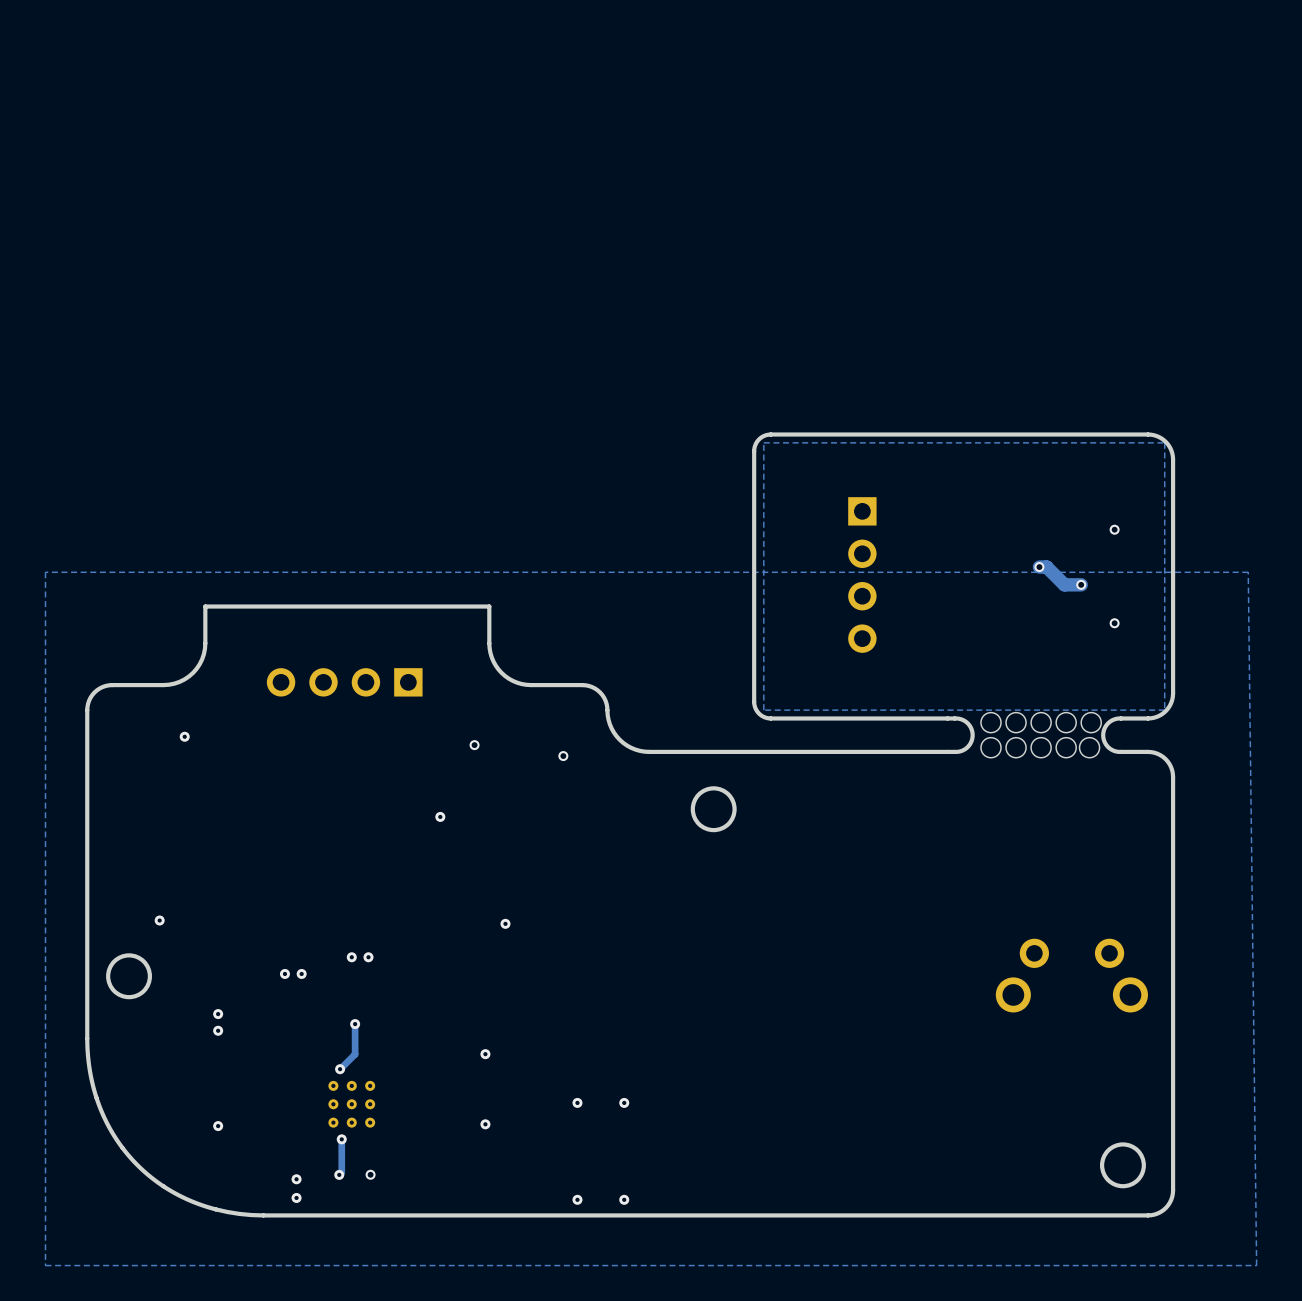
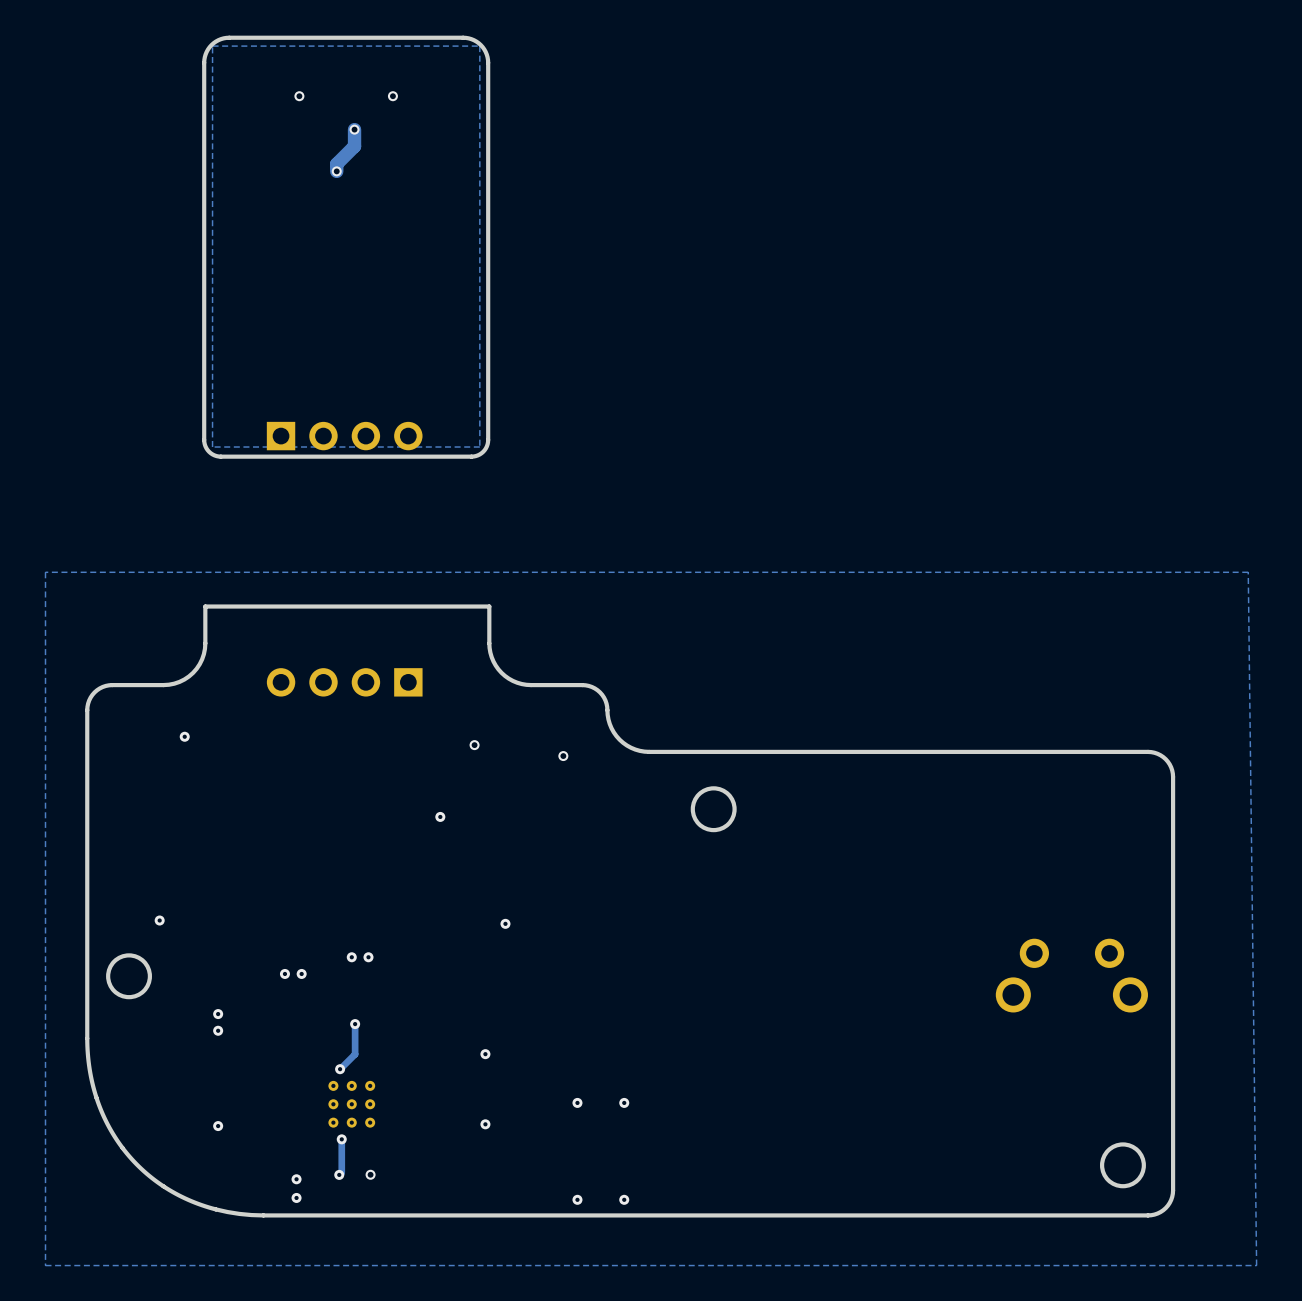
board edge: none -> (463, 37) (229, 37) (218, 40) (208, 49) (204, 62) (204, 439) (206, 448) (212, 454) (220, 456) (471, 456) (479, 454) (485, 448) (488, 439) (488, 62) (485, 51) (480, 45) (473, 40) (463, 37)
zone outline: none -> (479, 46) (212, 46) (212, 447) (479, 447) (479, 46)
via: none -> (299, 96)
via: none -> (392, 96)
track: none -> (354, 129) (354, 146) (336, 164) (336, 171)
via: none -> (354, 129)
via: none -> (336, 171)
part: none -> (344, 436)
zone outline: (1164, 442) (1164, 710) (763, 710) (763, 442) (1164, 442) -> none
via: (1114, 529) -> none
track: (1039, 567) (1046, 567) (1064, 584) (1081, 584) -> none
via: (1039, 567) -> none
part: (862, 574) -> none
via: (1081, 584) -> none
via: (1114, 623) -> none
round board edge: [980, 712, 1002, 734] -> none
round board edge: [1005, 712, 1027, 734] -> none
round board edge: [1030, 712, 1052, 734] -> none
round board edge: [1055, 712, 1077, 734] -> none
round board edge: [1080, 712, 1102, 734] -> none
round board edge: [980, 737, 1002, 759] -> none
round board edge: [1005, 737, 1027, 759] -> none
round board edge: [1030, 737, 1052, 759] -> none
round board edge: [1055, 737, 1077, 759] -> none
round board edge: [1079, 737, 1101, 759] -> none
board edge: (1121, 751) (1112, 750) (1105, 743) (1103, 733) (1107, 723) (1116, 718) (1157, 716) (1167, 708) (1172, 696) (1173, 459) (1170, 448) (1163, 439) (1148, 434) (770, 434) (761, 437) (756, 442) (754, 451) (754, 701) (756, 710) (761, 715) (770, 718) (958, 718) (969, 725) (972, 737) (966, 748) (954, 751) -> (1121, 751) (954, 751)

